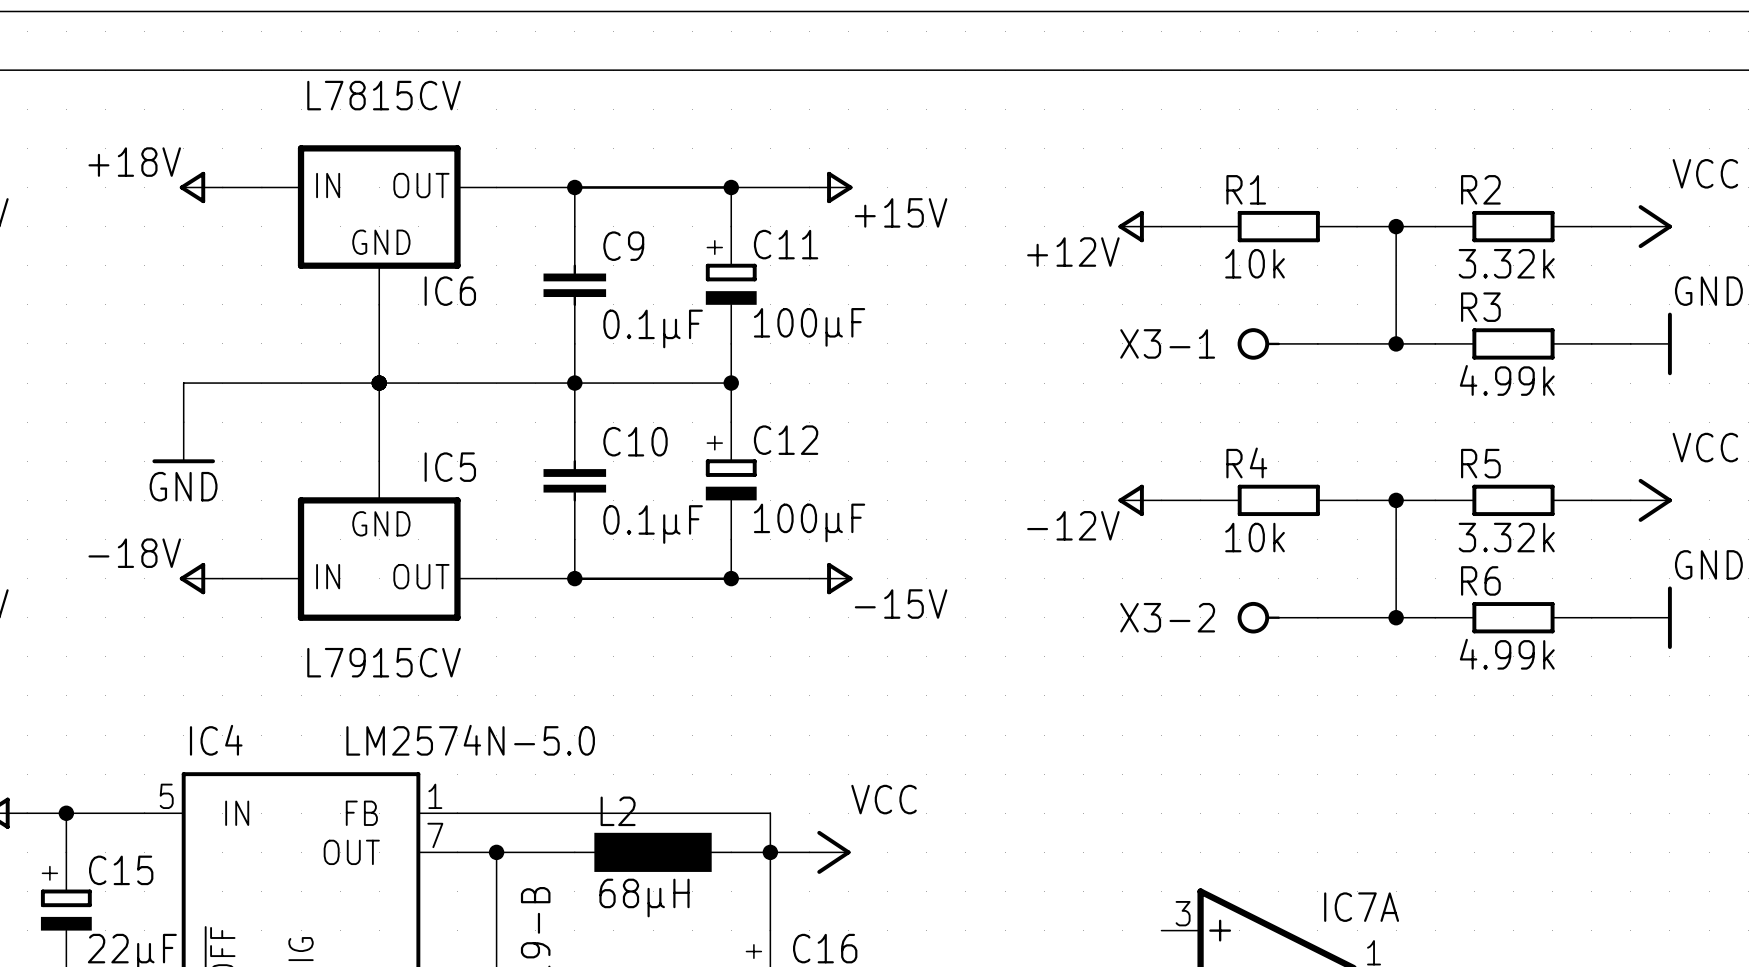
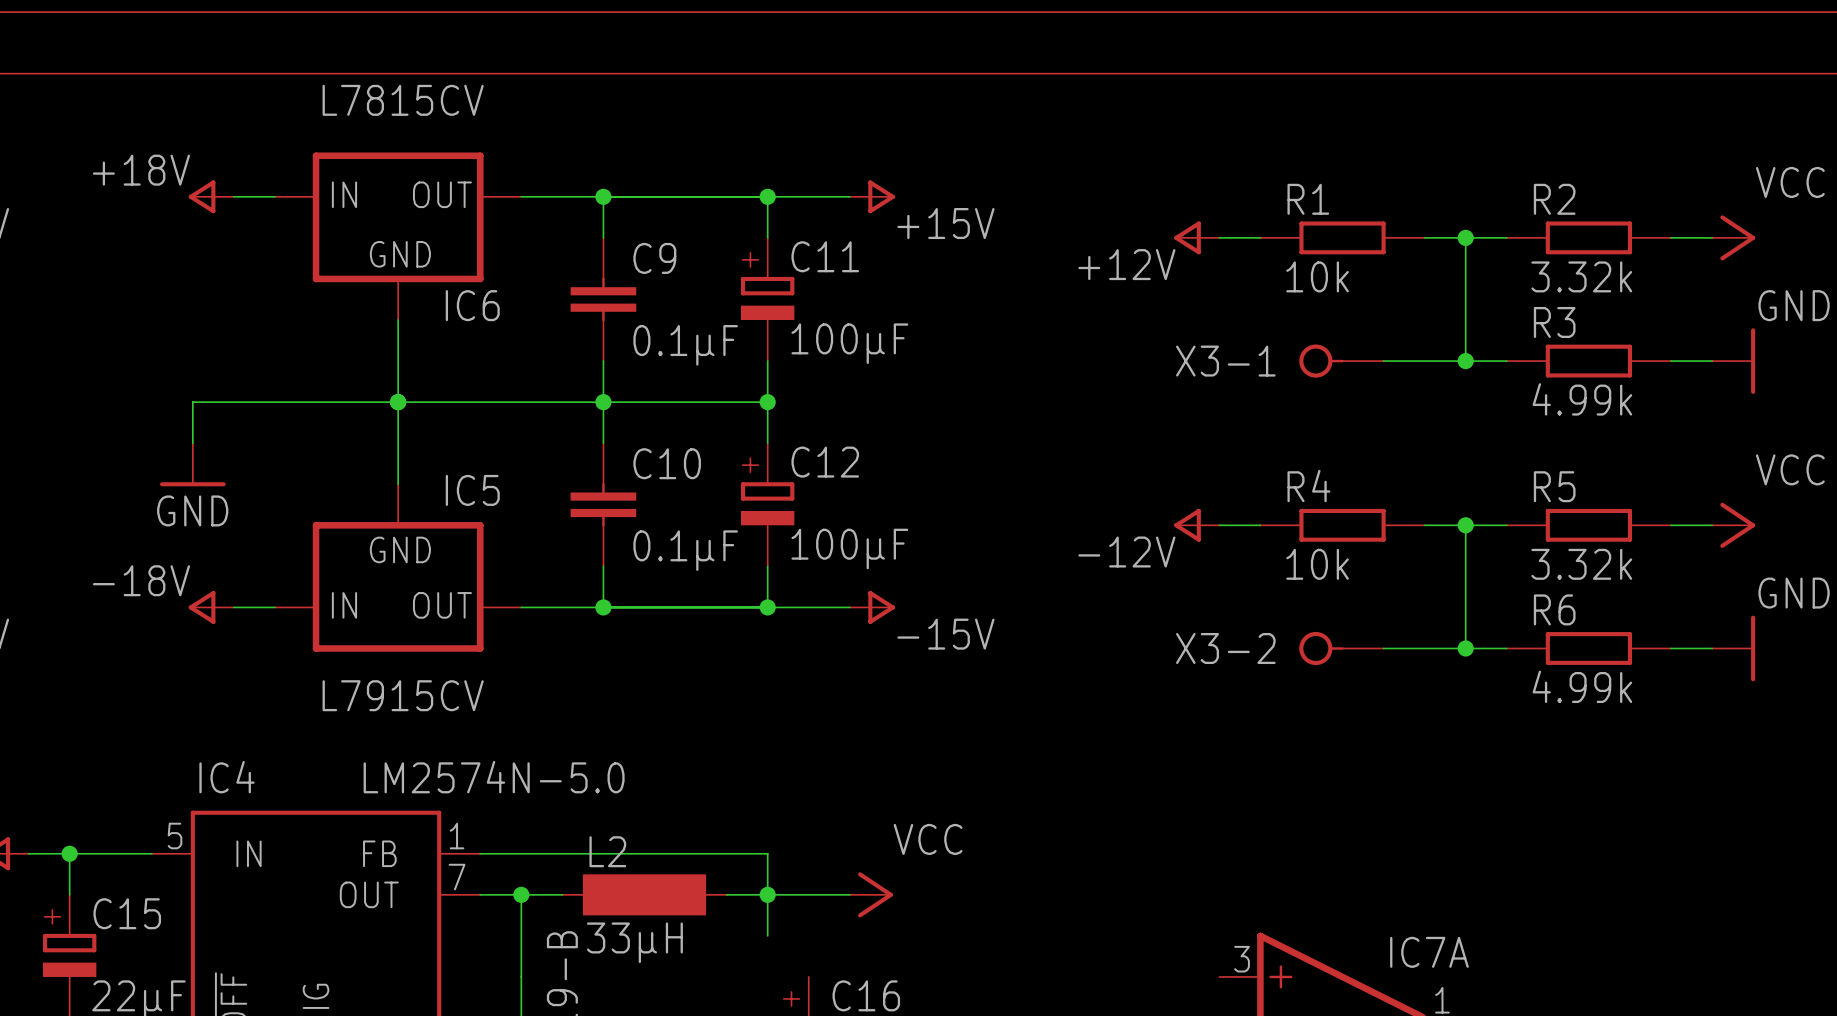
wire: (731, 813) (770, 813) (770, 930) -> (767, 853) (767, 935)
L2 position: (653, 852) -> (644, 894)
junction position: (770, 852) -> (767, 894)
L2 value: 68µH (644, 898) -> 33µH (634, 942)

